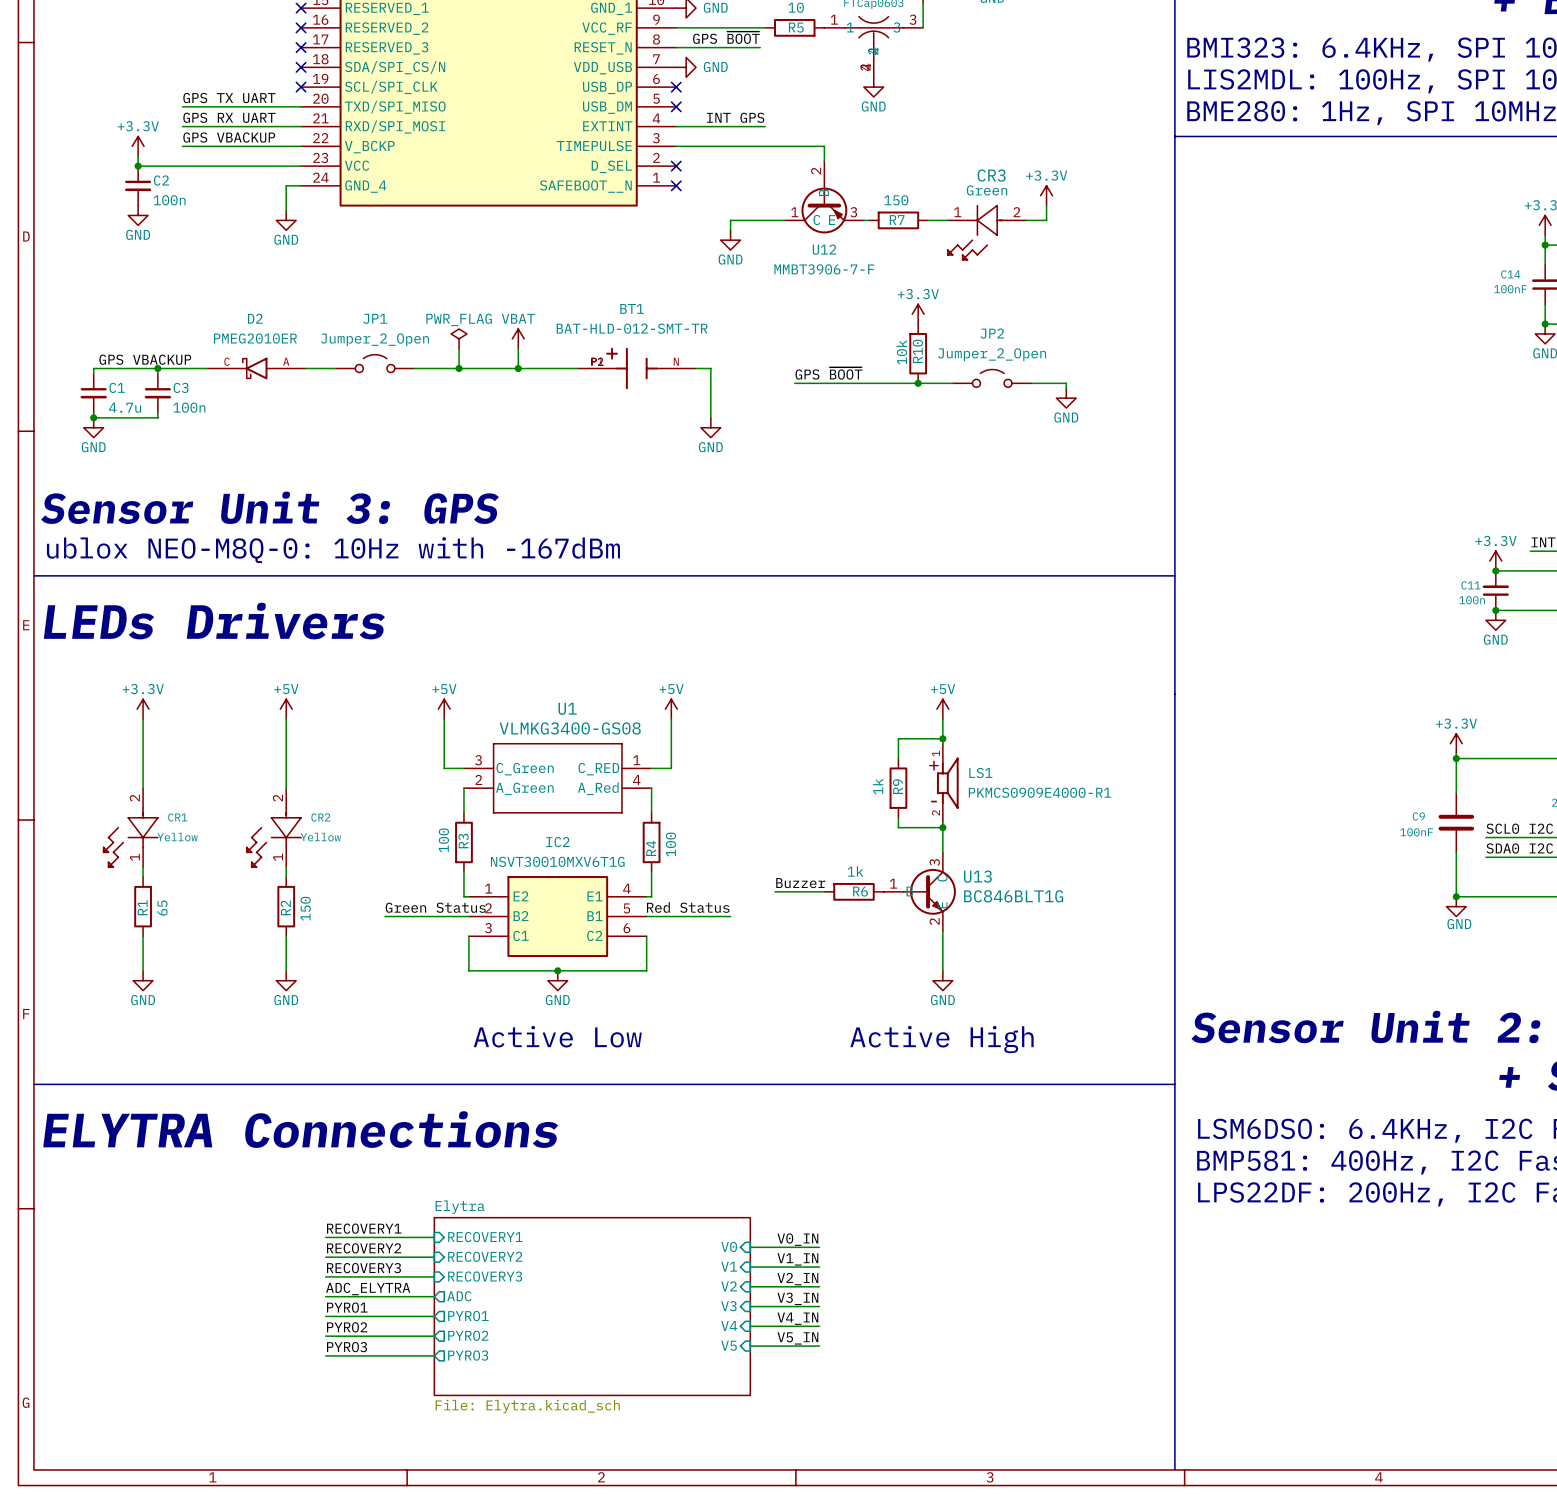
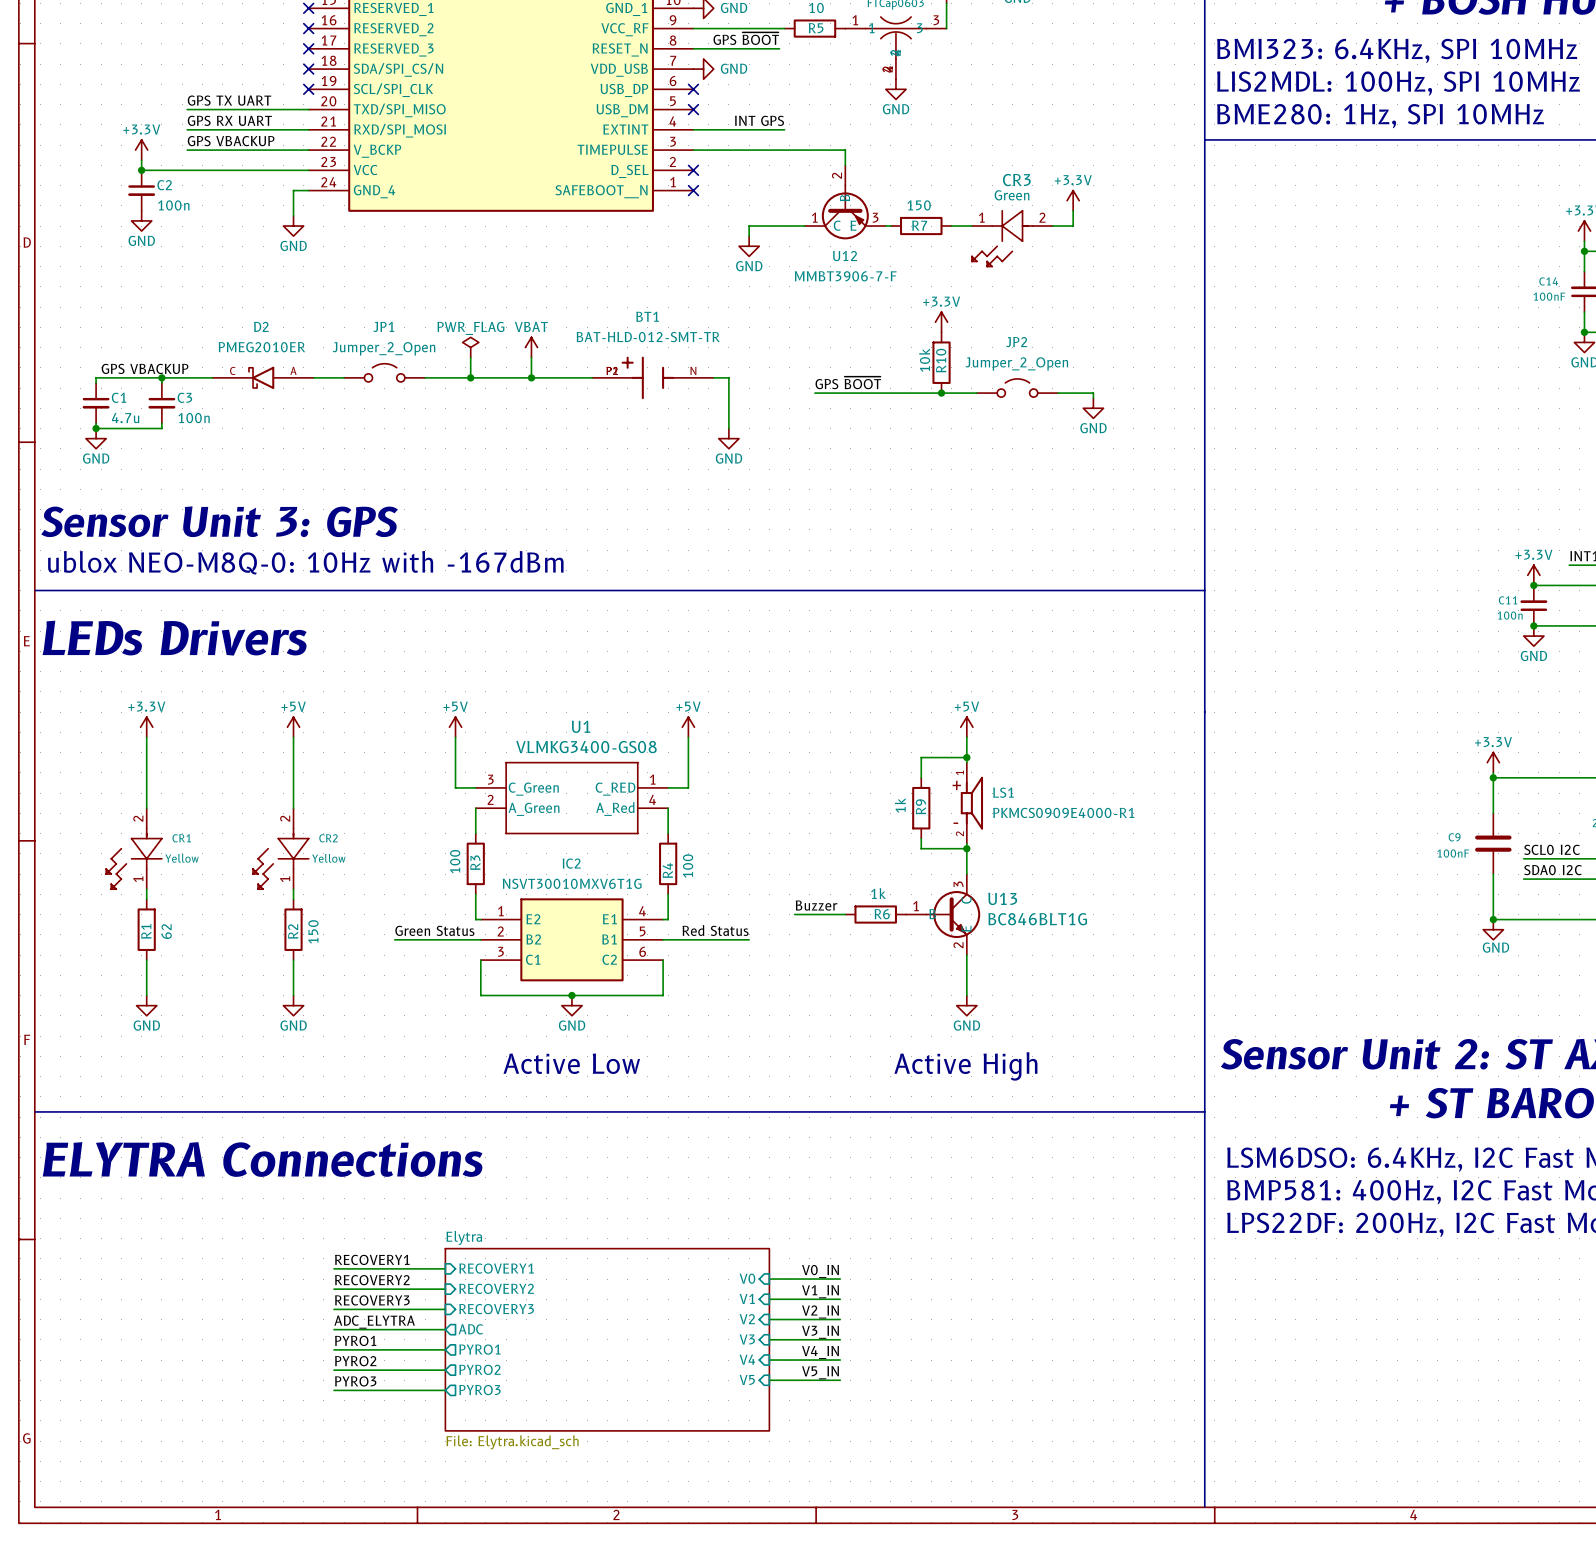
R1 value: 65 (162, 908) -> 62 (166, 931)

